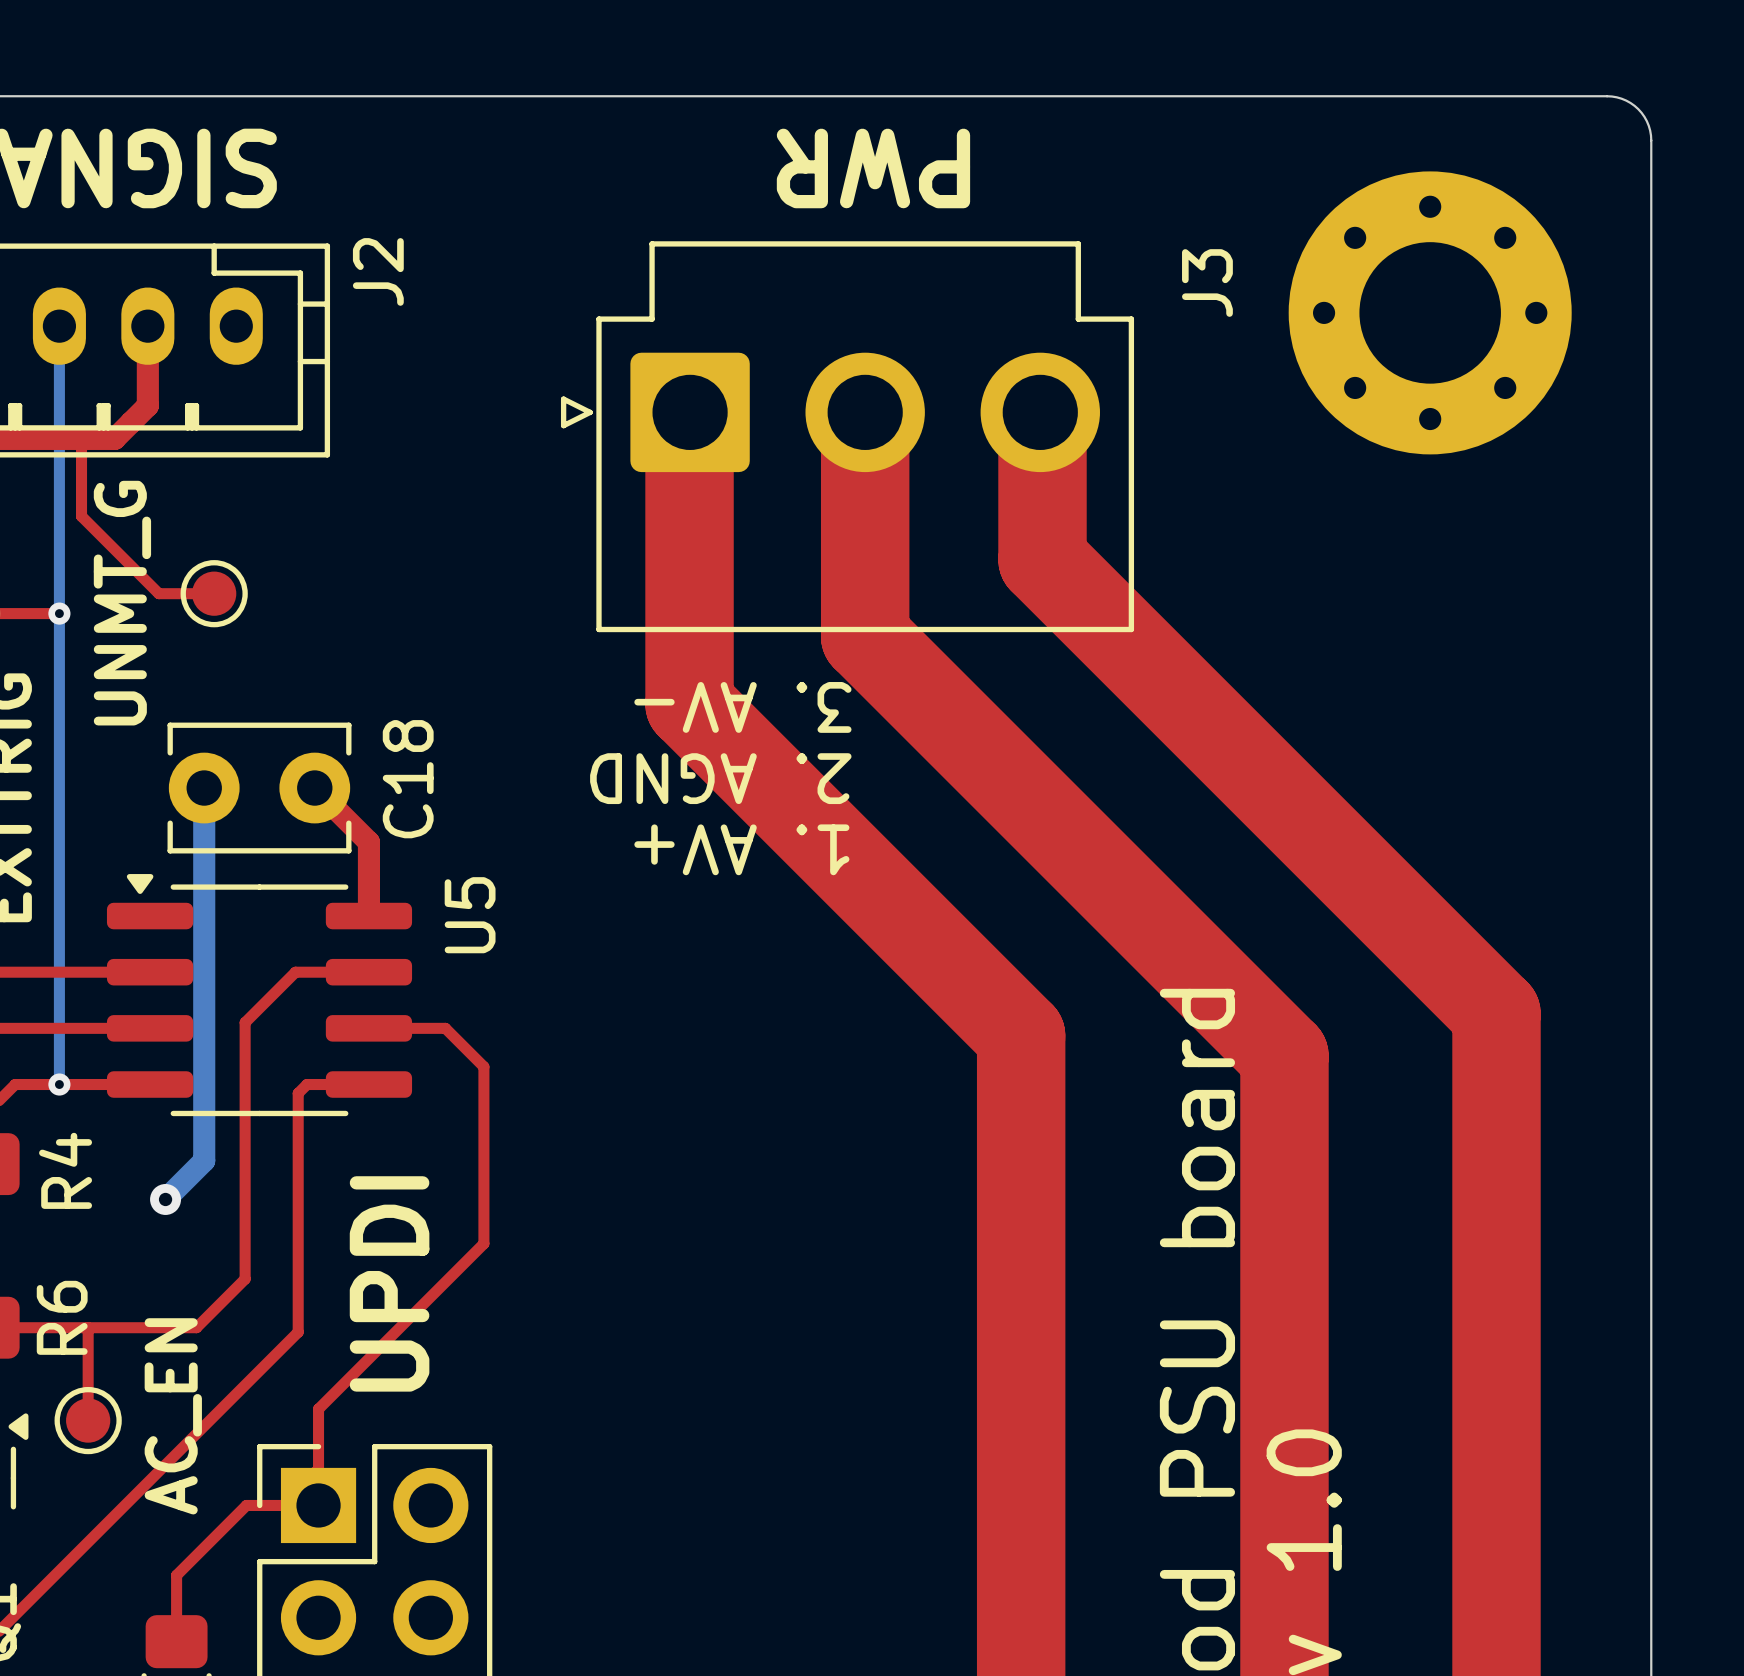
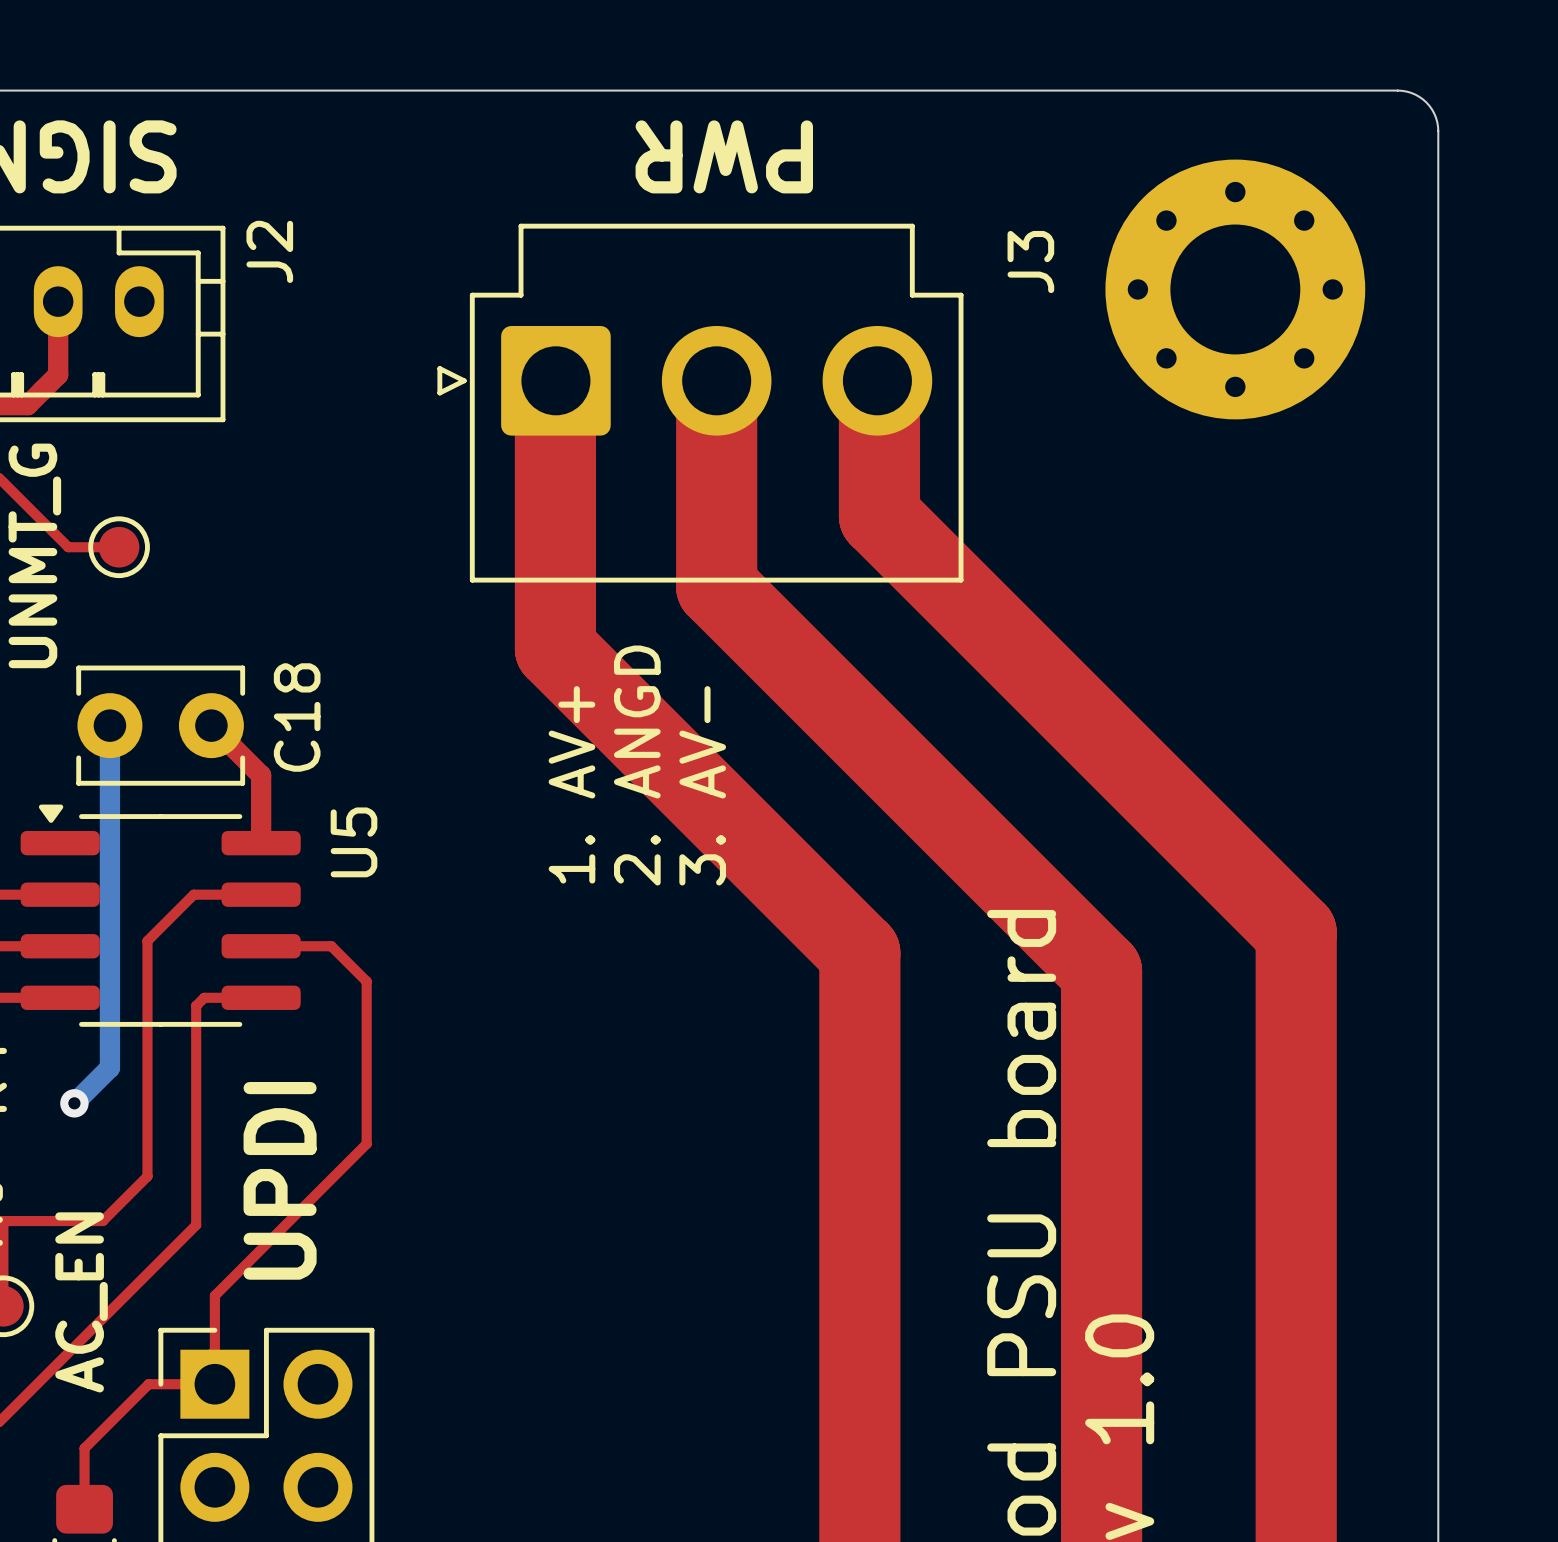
text rotation: 0° (742, 707) -> 90° clockwise (702, 785)
text: 2. AGND (720, 778) -> 2. ANGD (637, 765)
text rotation: 0° (741, 849) -> 90° clockwise (571, 784)

